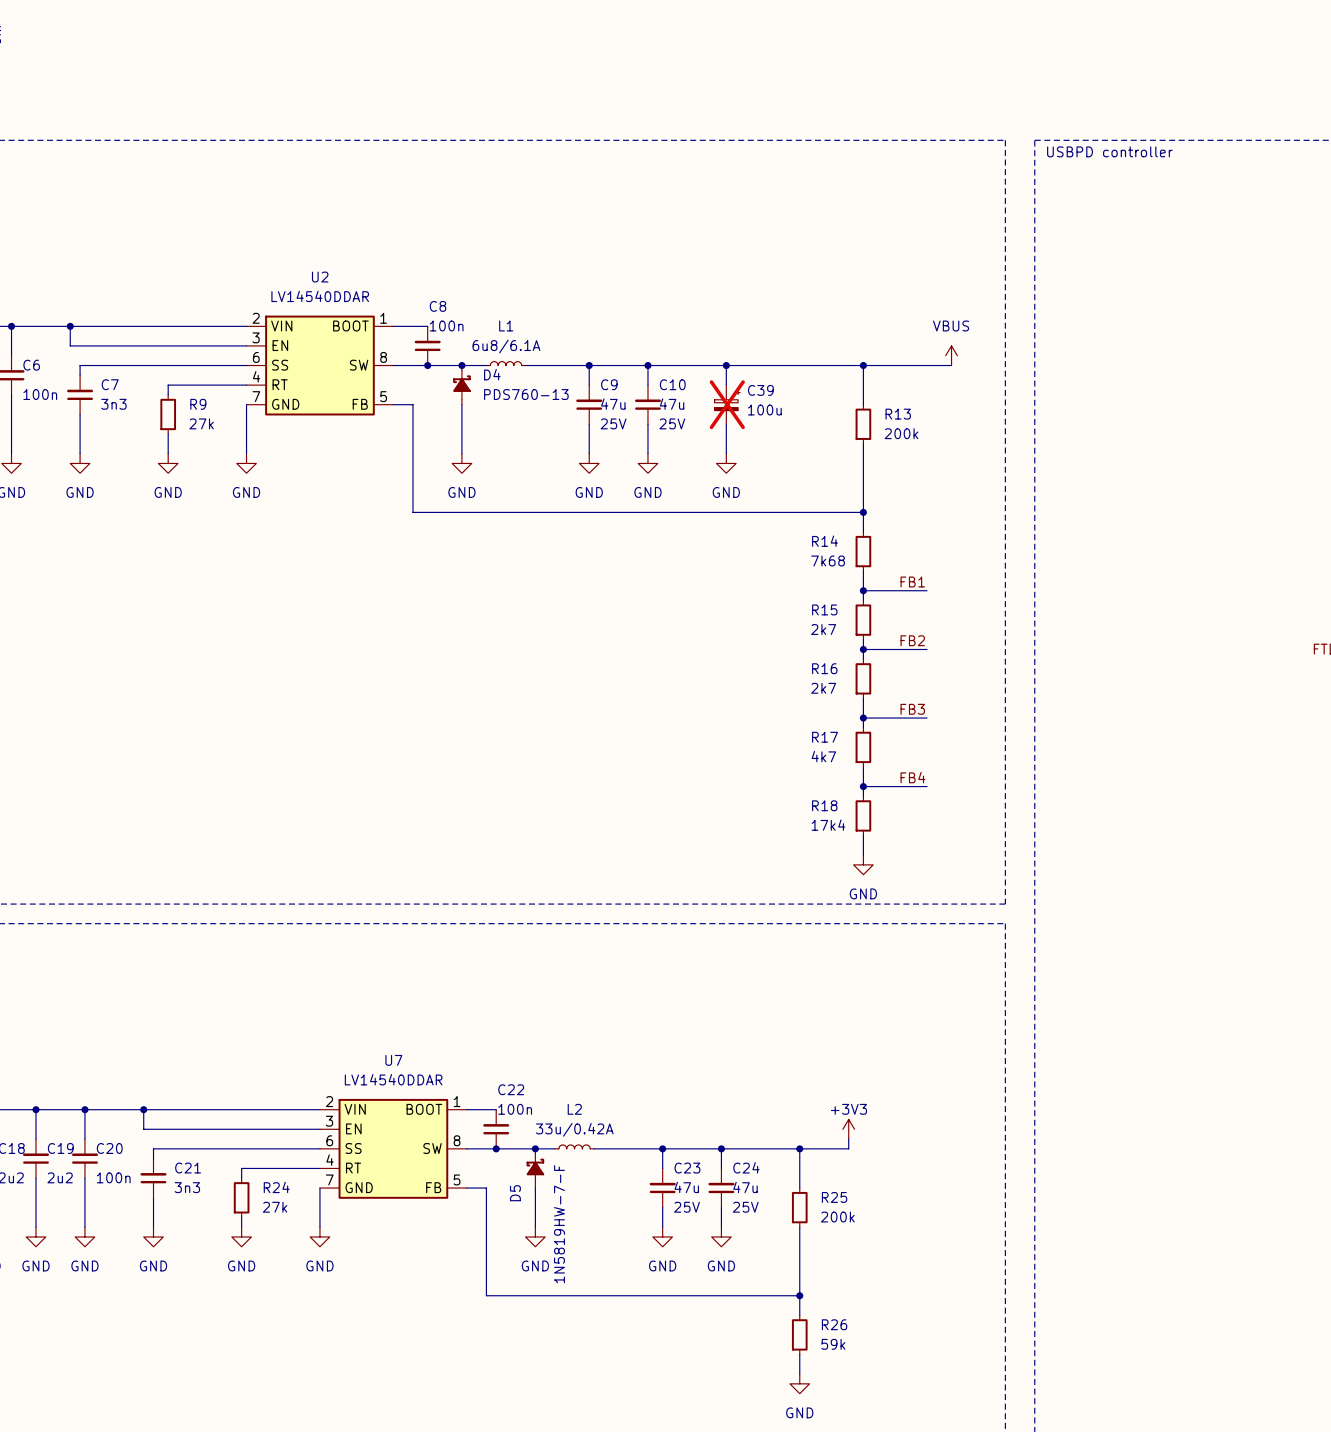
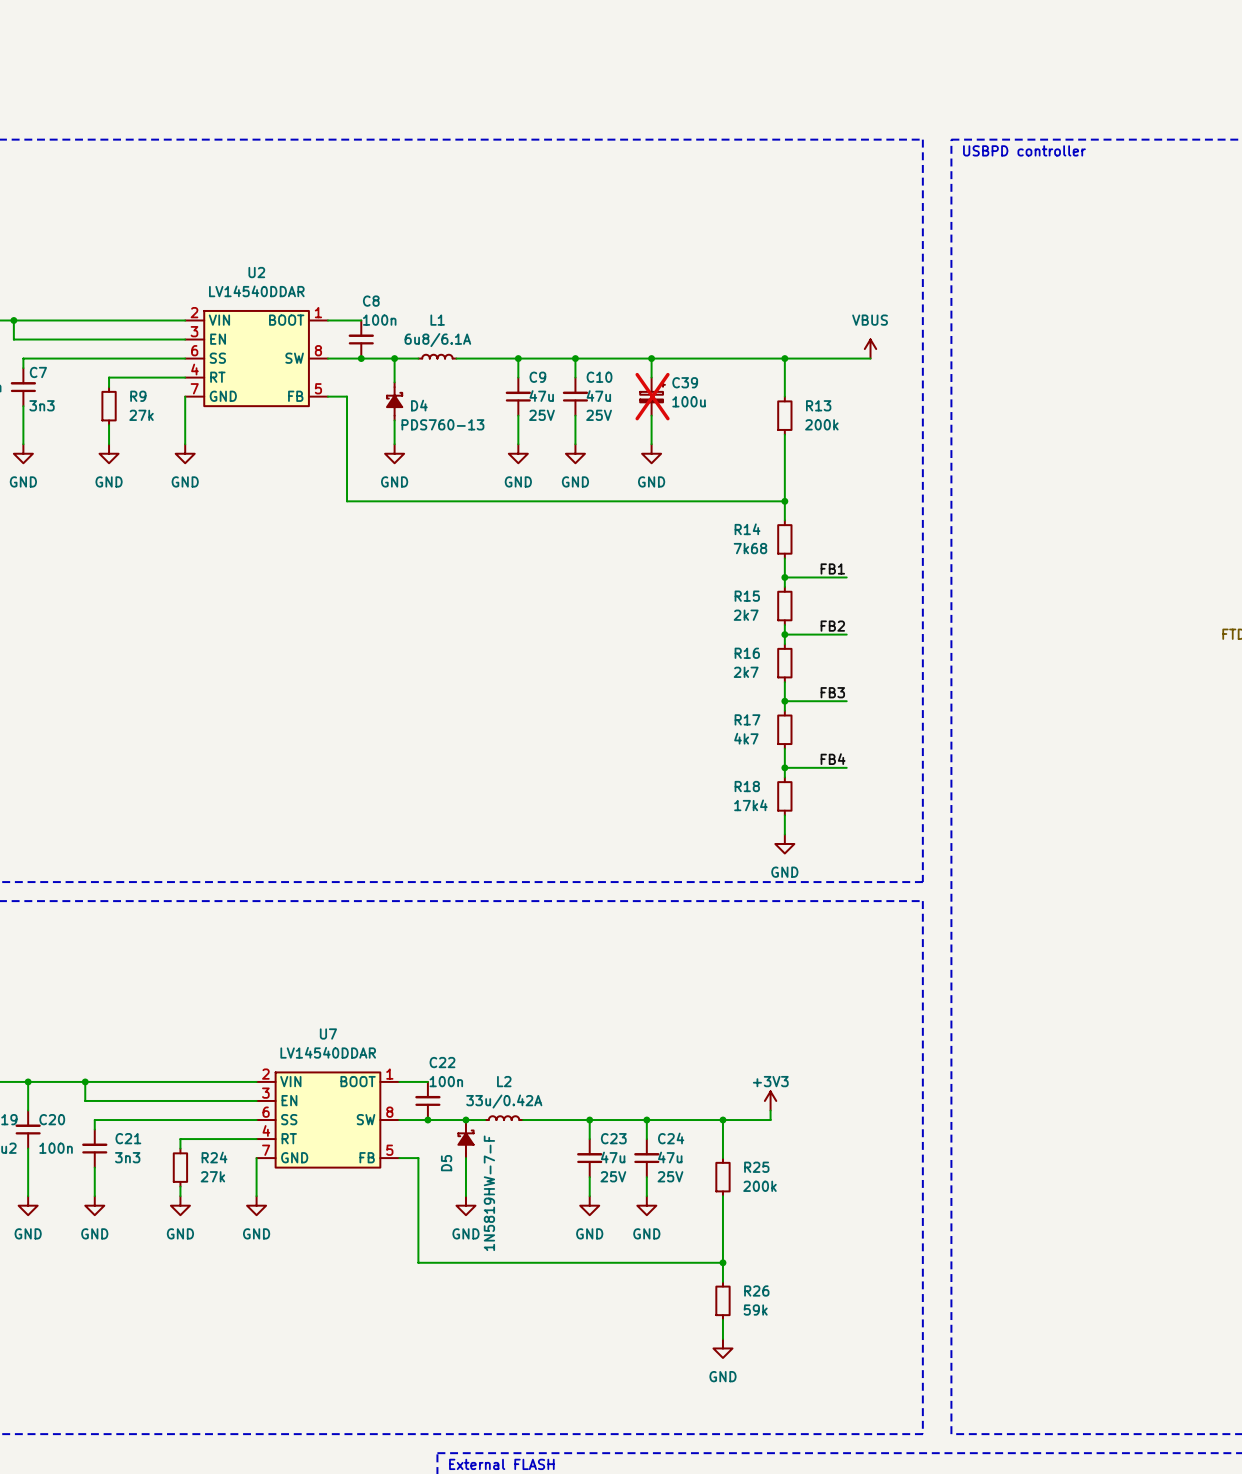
D4 name position: D4 (492, 374) -> D4 (419, 405)
C7 name position: C7 (110, 384) -> C7 (38, 372)
D4 position: (461, 385) -> (394, 401)
D4 text position: PDS760-13 (526, 394) -> PDS760-13 (442, 424)
C7 text position: 3n3 (113, 404) -> 3n3 (42, 405)

